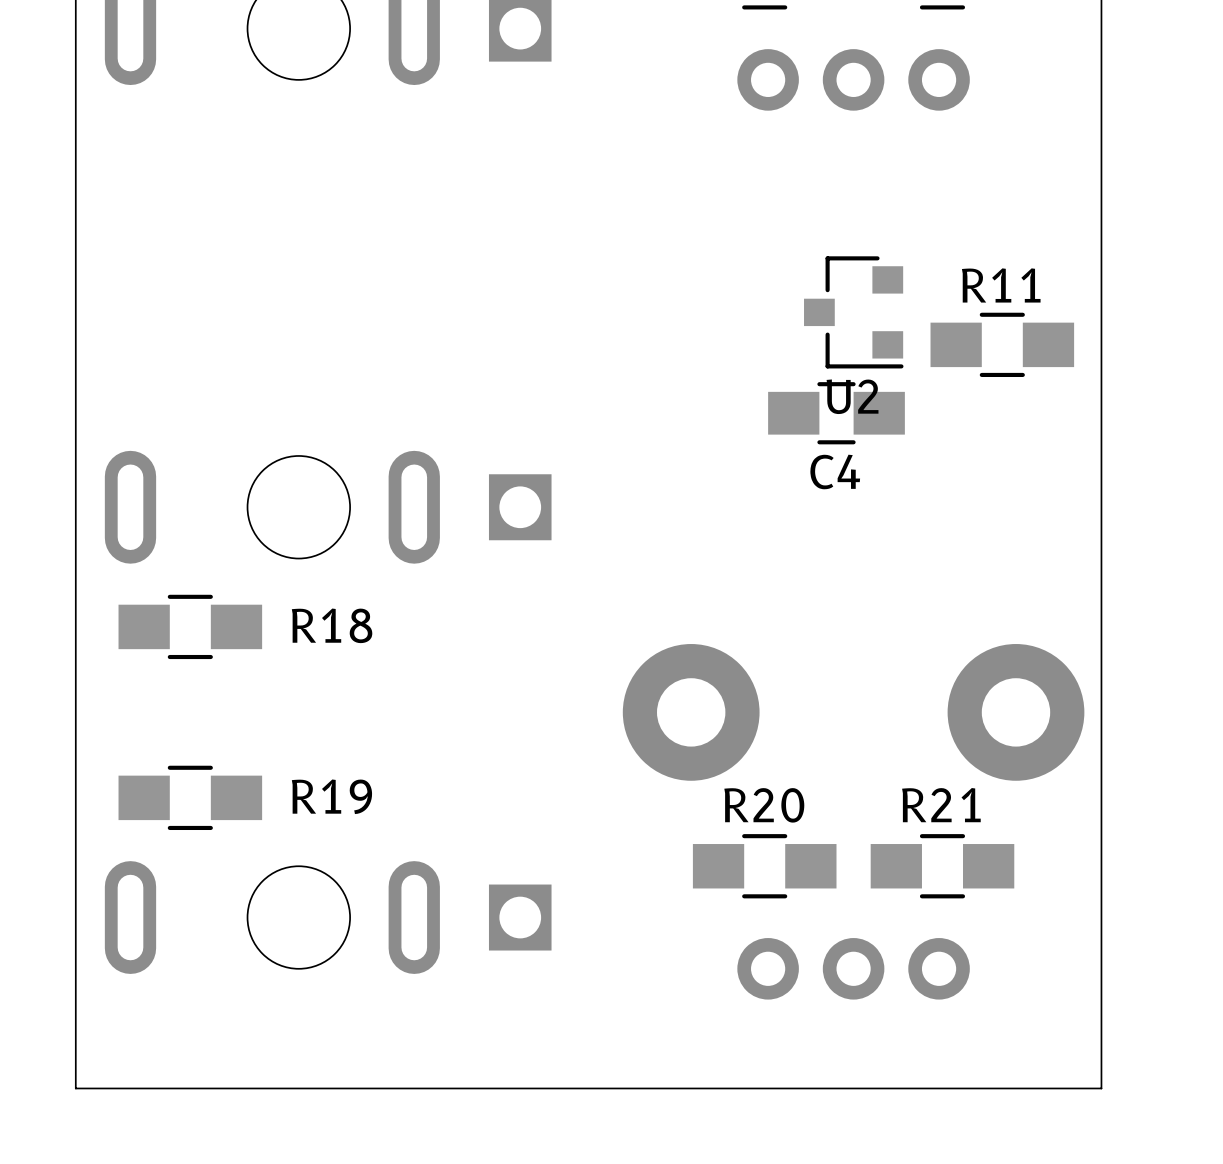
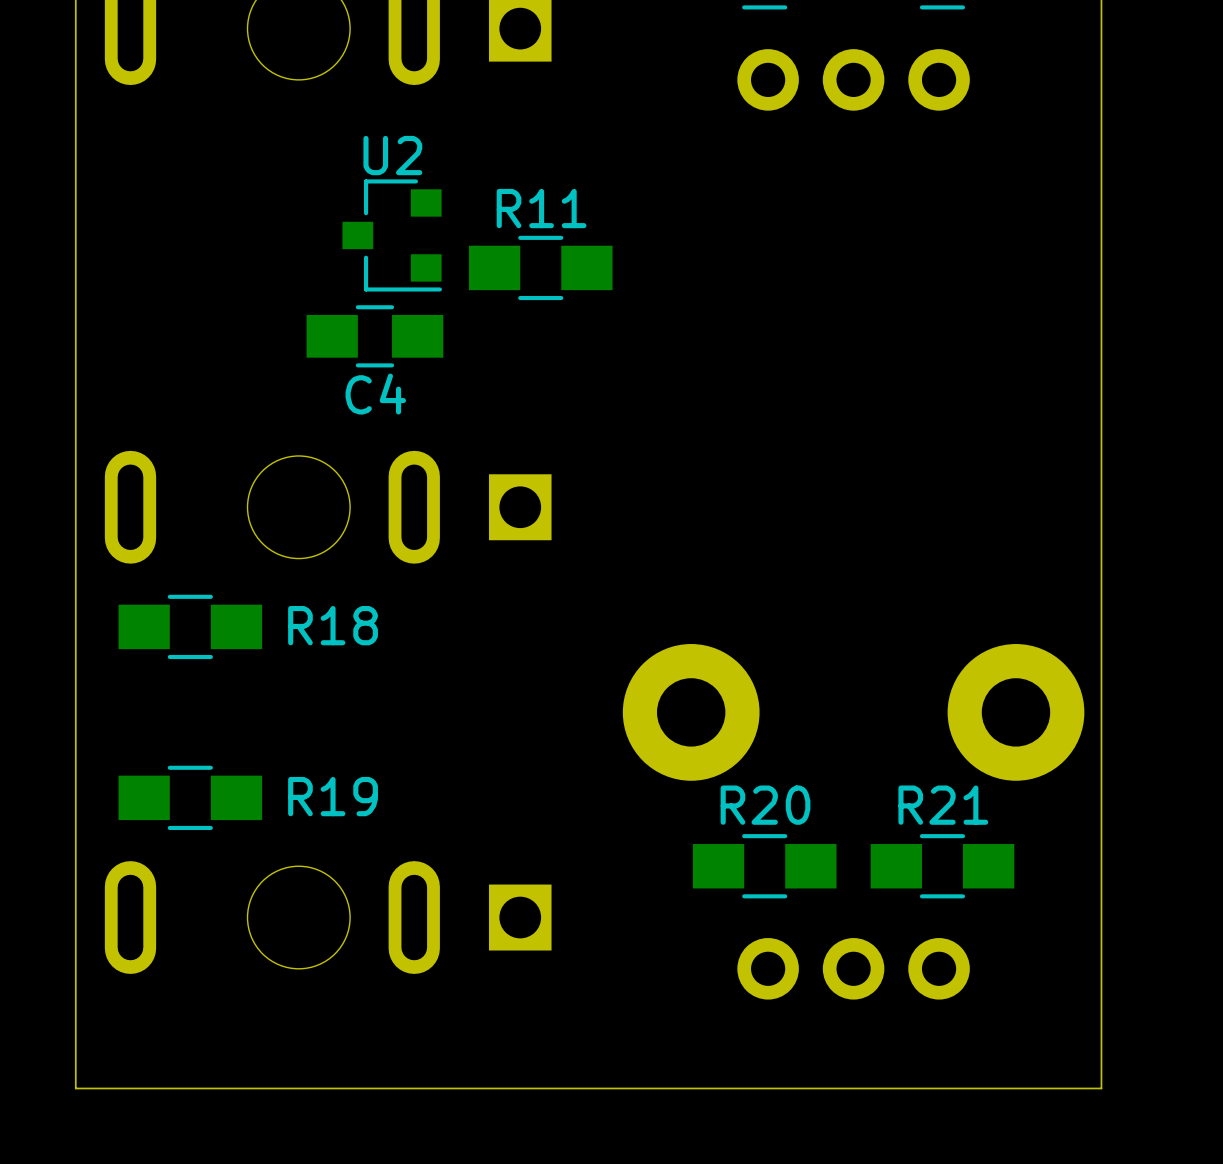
U2 position: (853, 312) -> (392, 235)
R11 position: (1002, 344) -> (540, 267)
U2 name position: U2 (852, 396) -> U2 (392, 155)
C4 position: (836, 413) -> (374, 336)

